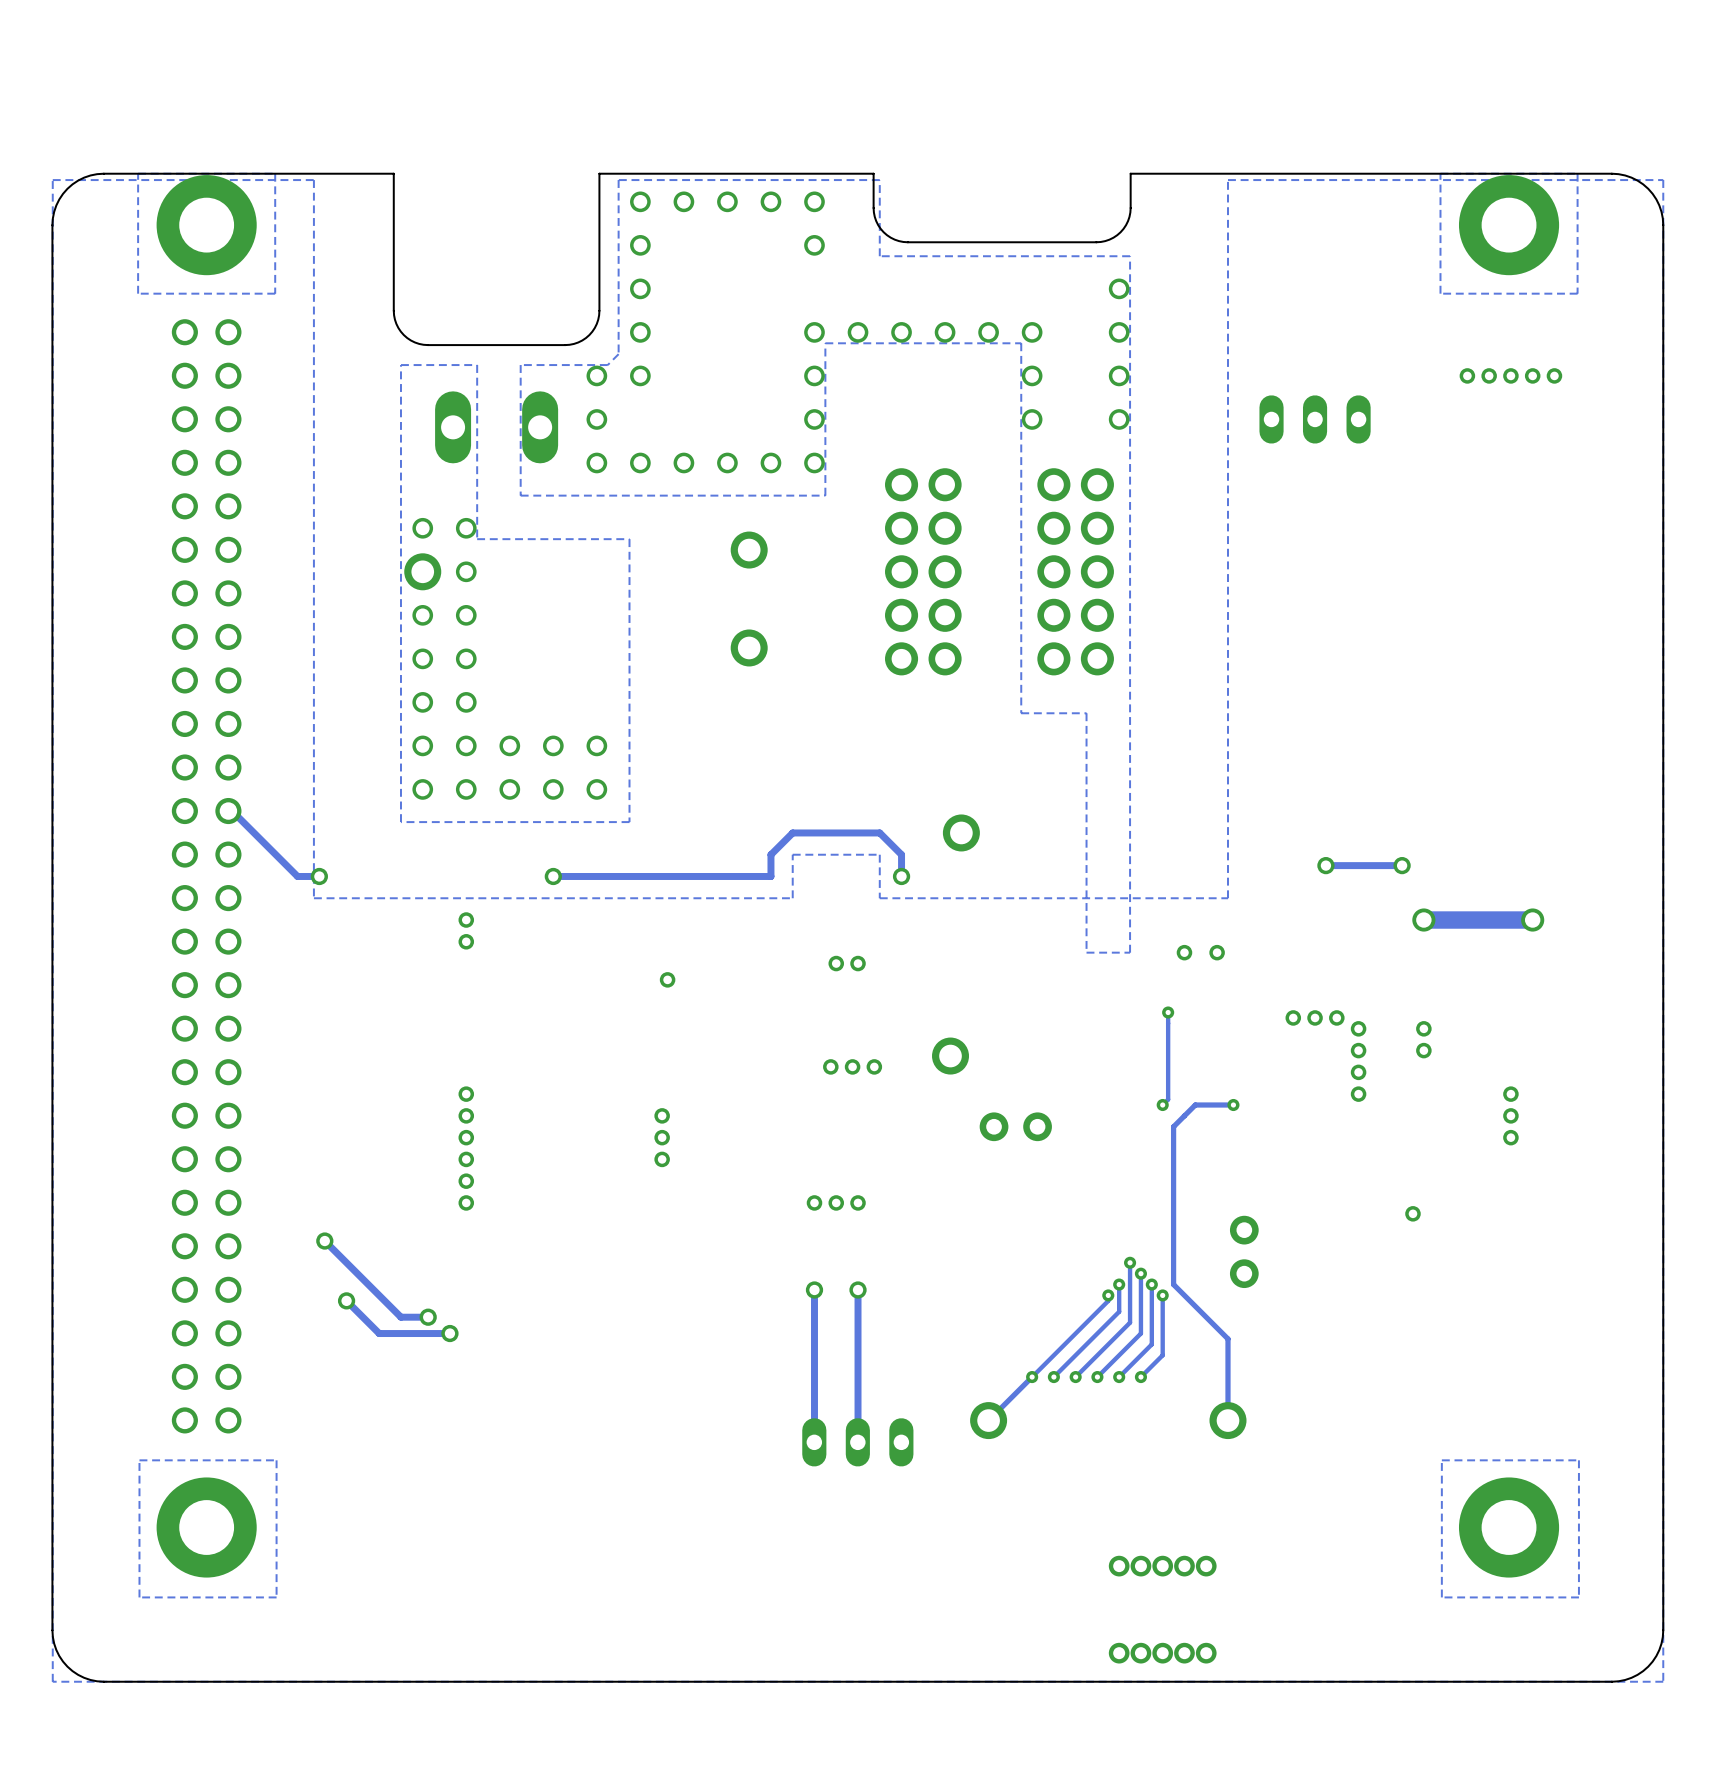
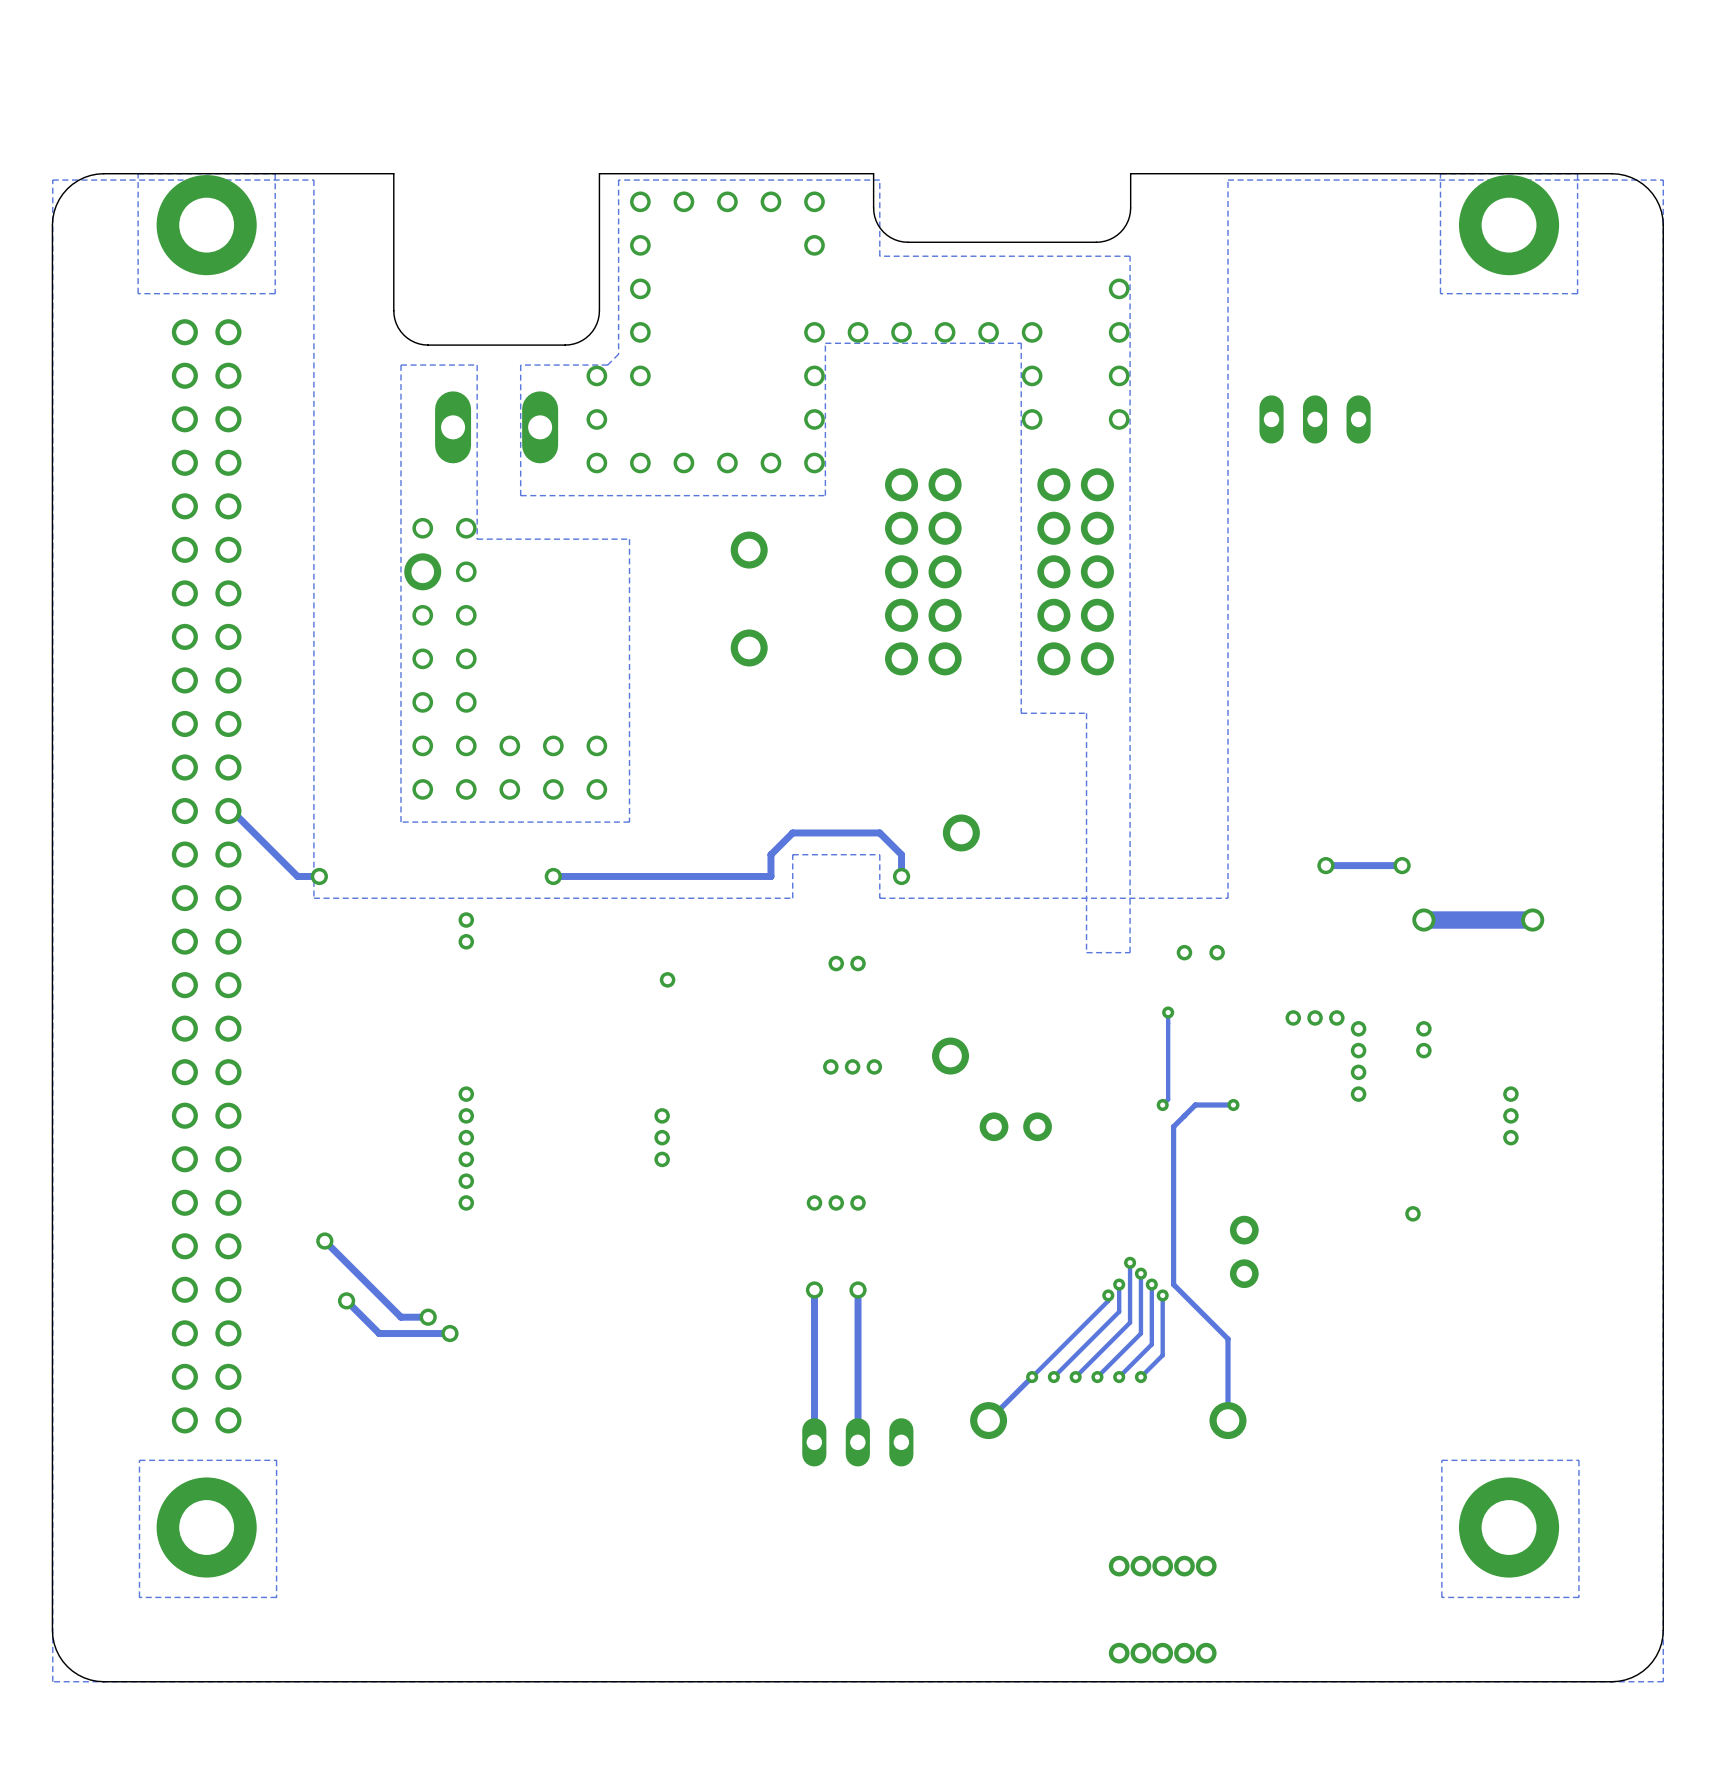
via: (1467, 375) -> none
via: (1489, 375) -> none
via: (1510, 375) -> none
via: (1532, 375) -> none
via: (1554, 375) -> none

